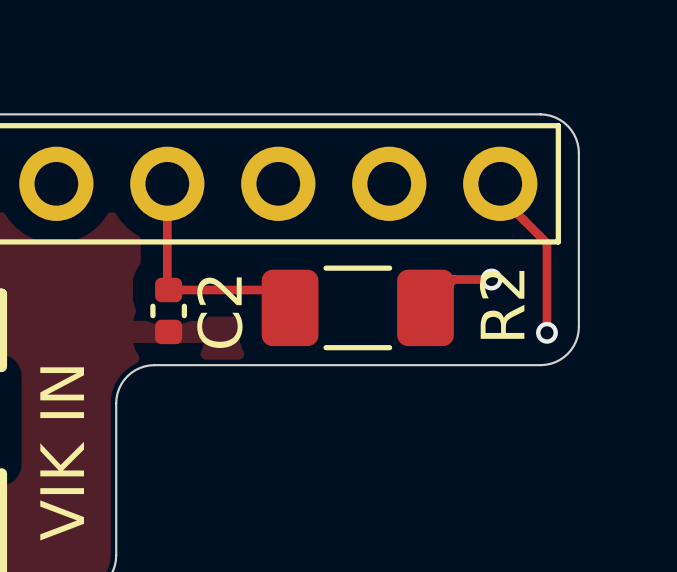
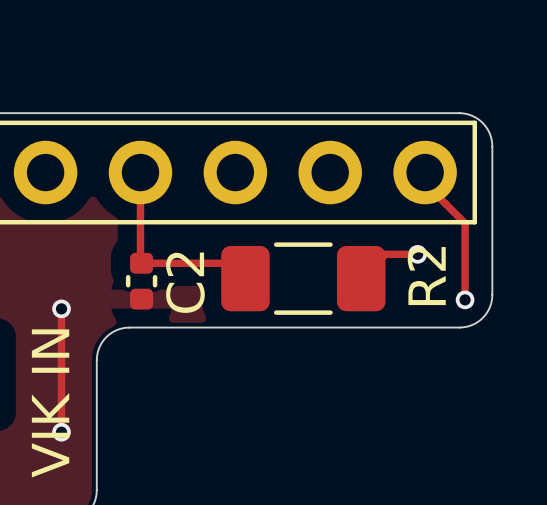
track: none -> (61, 308) (61, 432)
via: none -> (61, 308)
via: none -> (61, 432)

